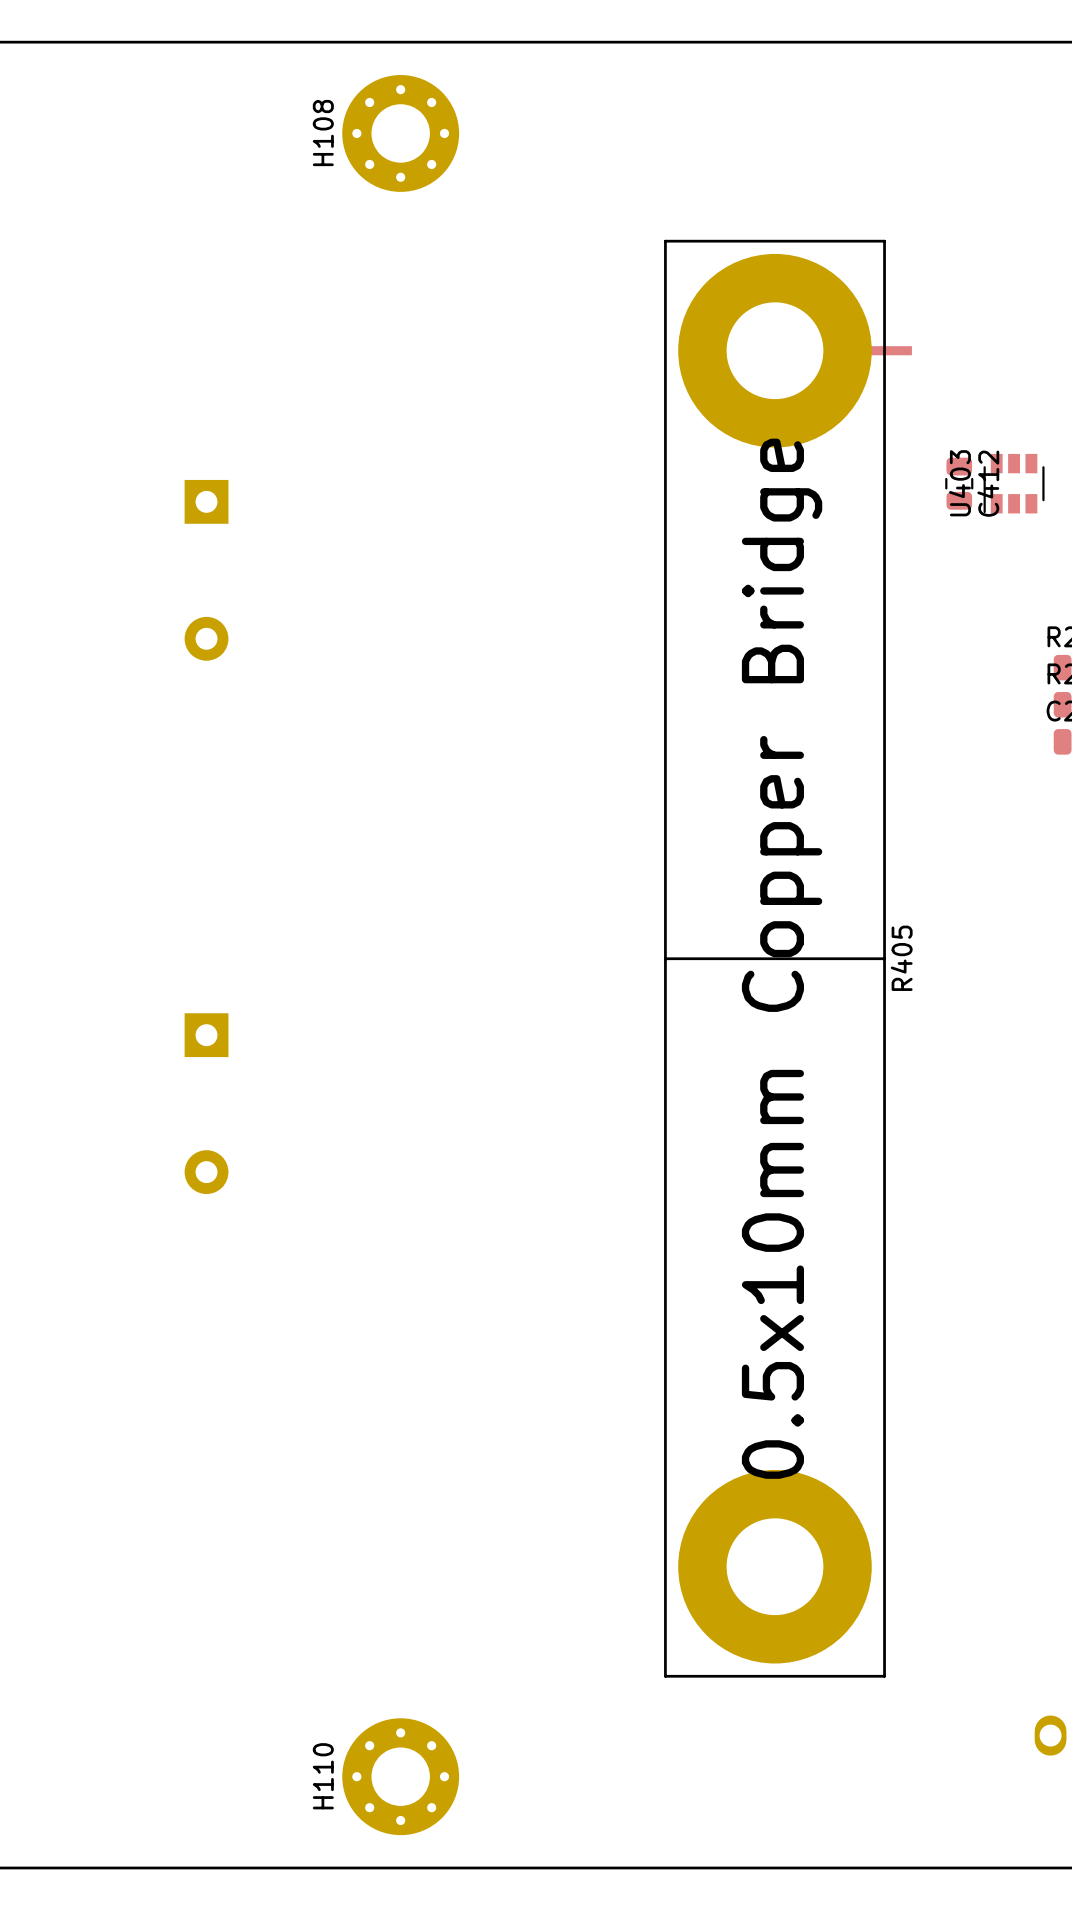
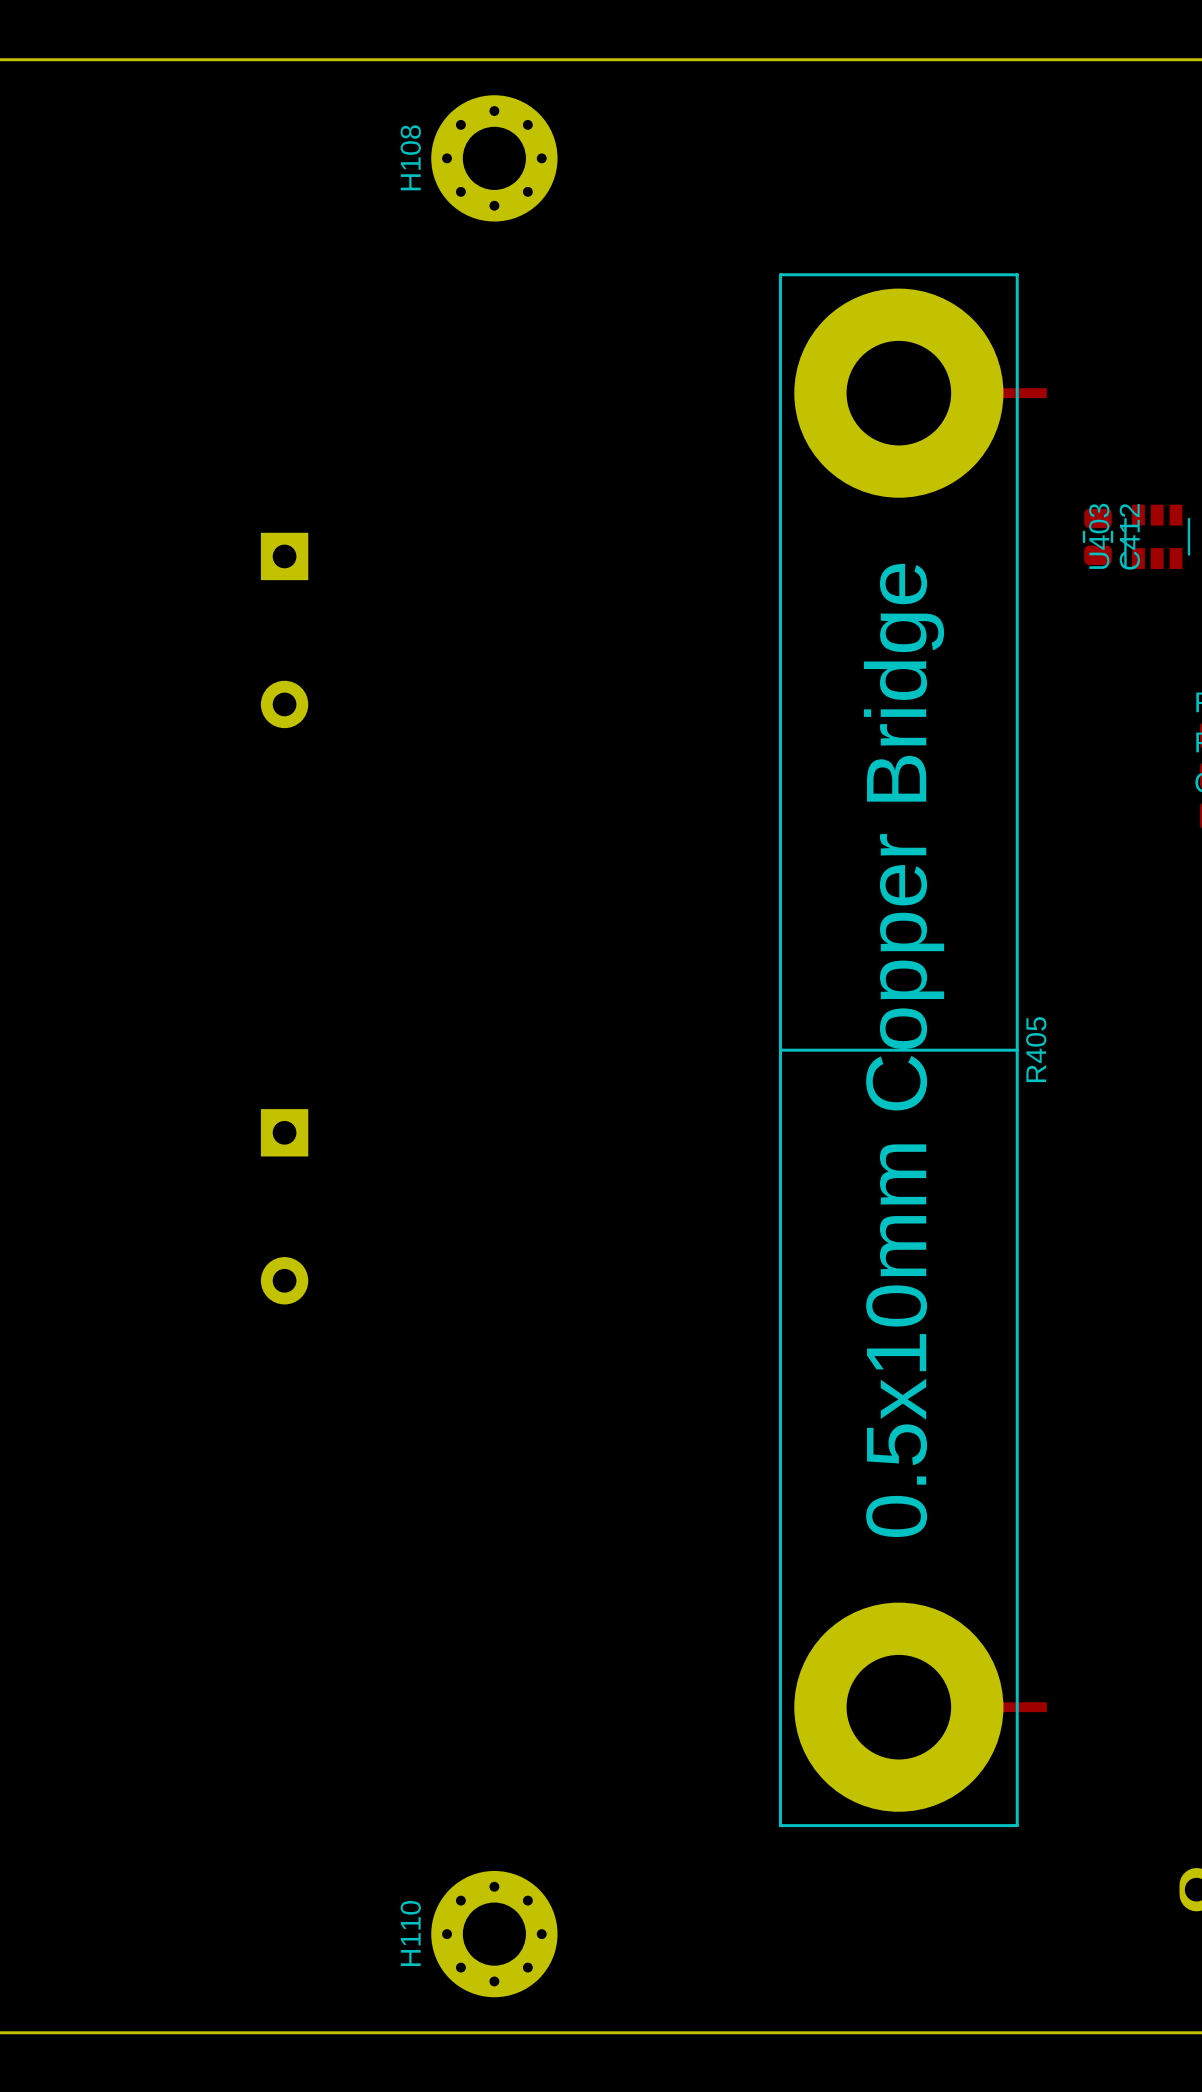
R405 footprint: [664, 239, 912, 1678] -> [779, 273, 1047, 1828]

